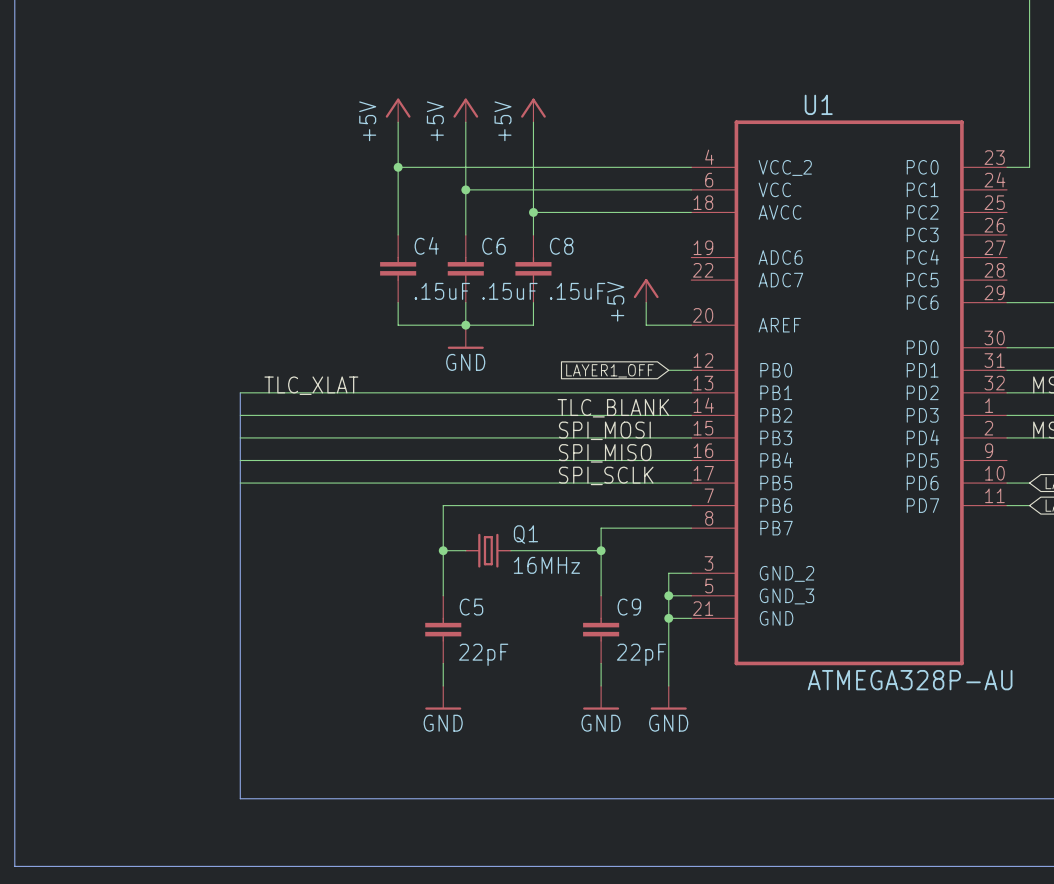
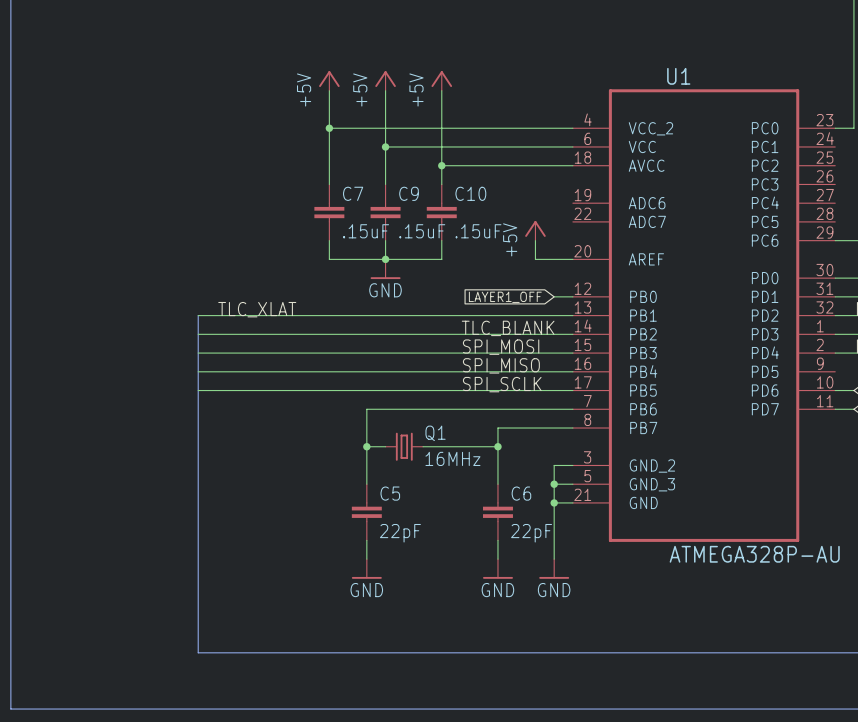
C4 name: C4 (426, 245) -> C7 (353, 193)
C6 name: C6 (494, 246) -> C9 (409, 193)
C8 name: C8 (561, 246) -> C10 (470, 193)
C9 name: C9 (629, 607) -> C6 (521, 493)

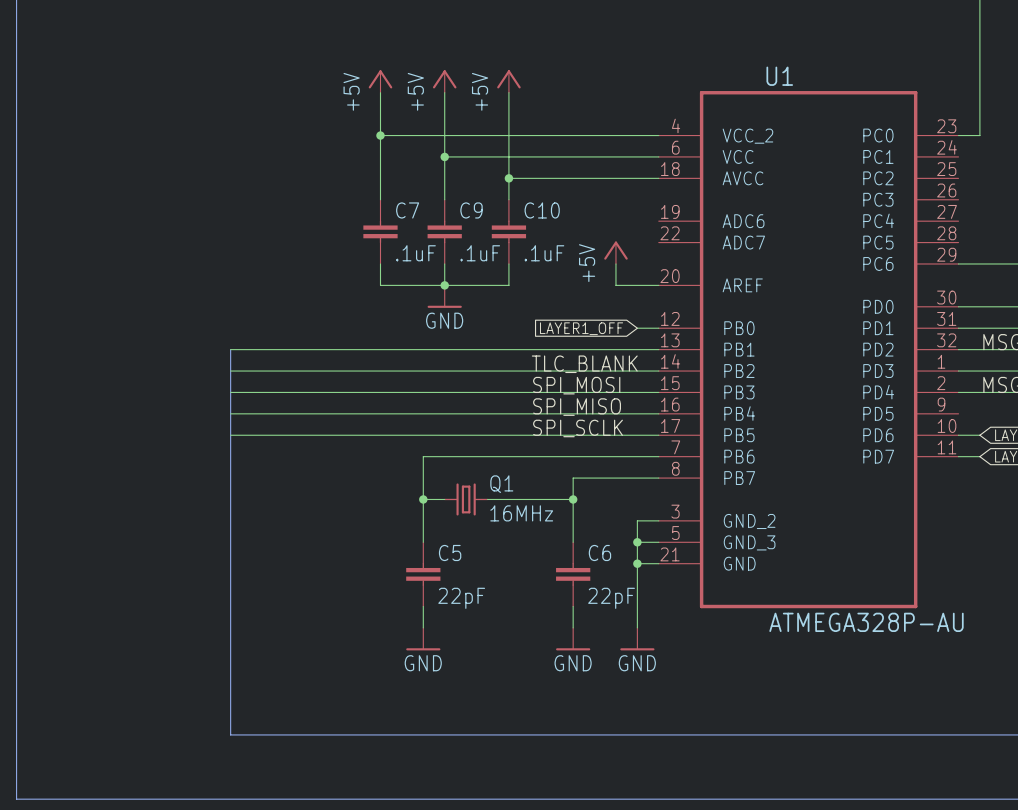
C7 value: .15uF (366, 231) -> .1uF (415, 253)
C9 value: .15uF (422, 231) -> .1uF (480, 253)
C10 value: .15uF (478, 231) -> .1uF (544, 253)
label: TLC_XLAT (257, 309) -> none

